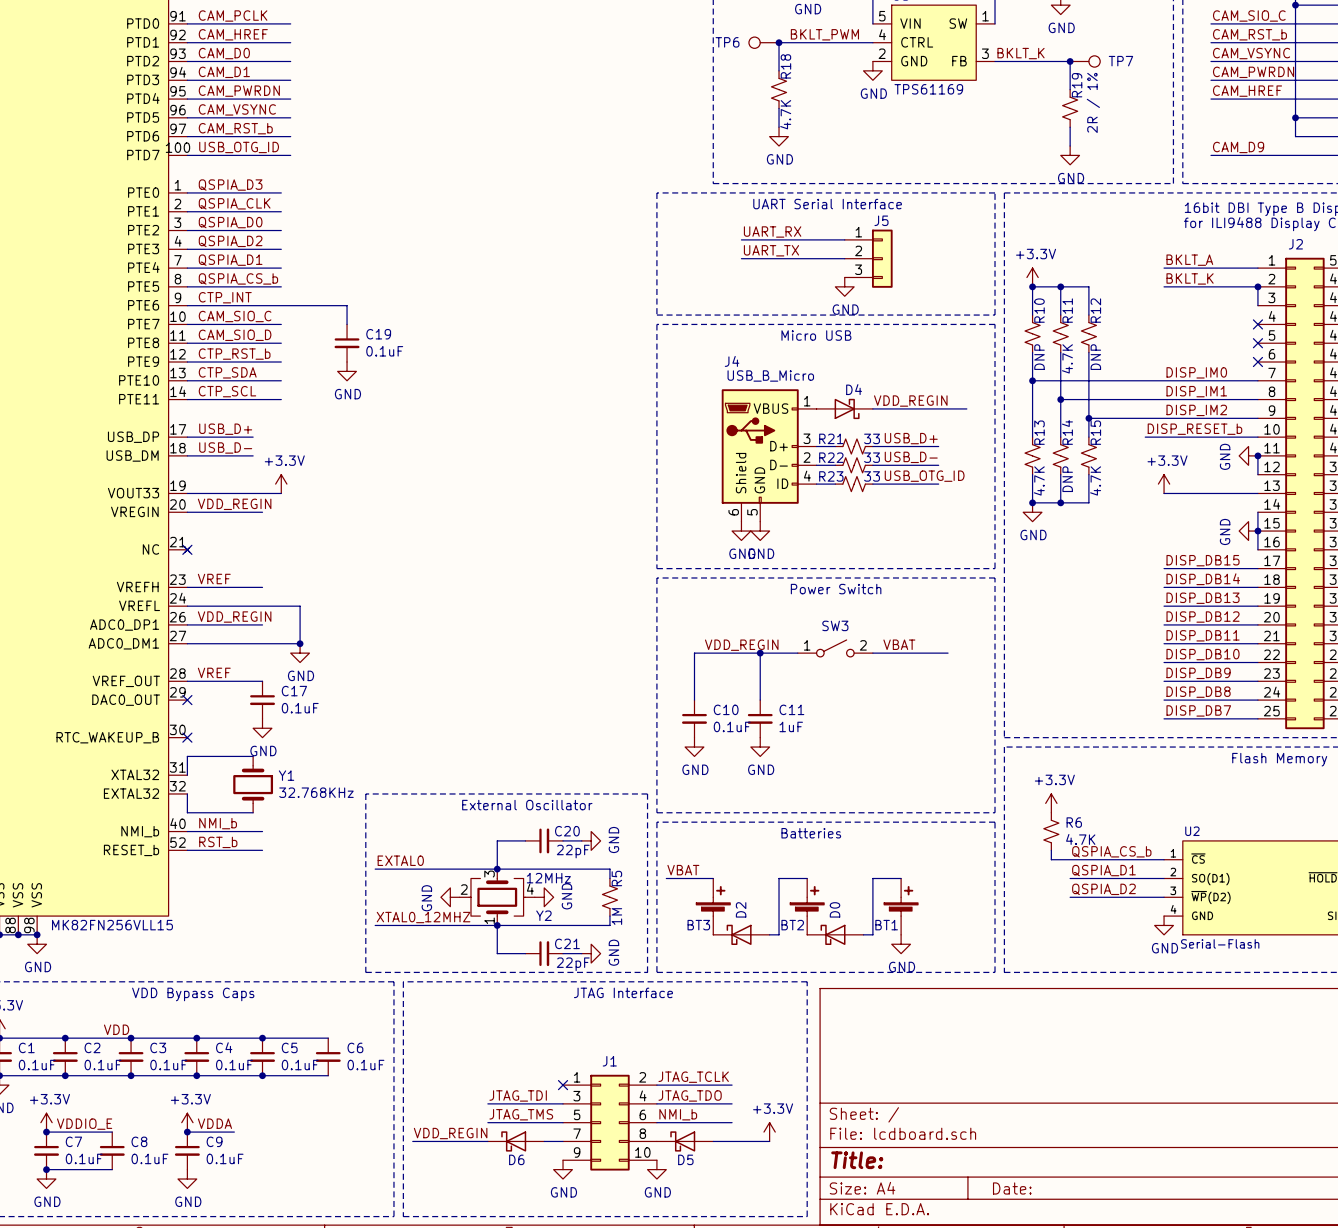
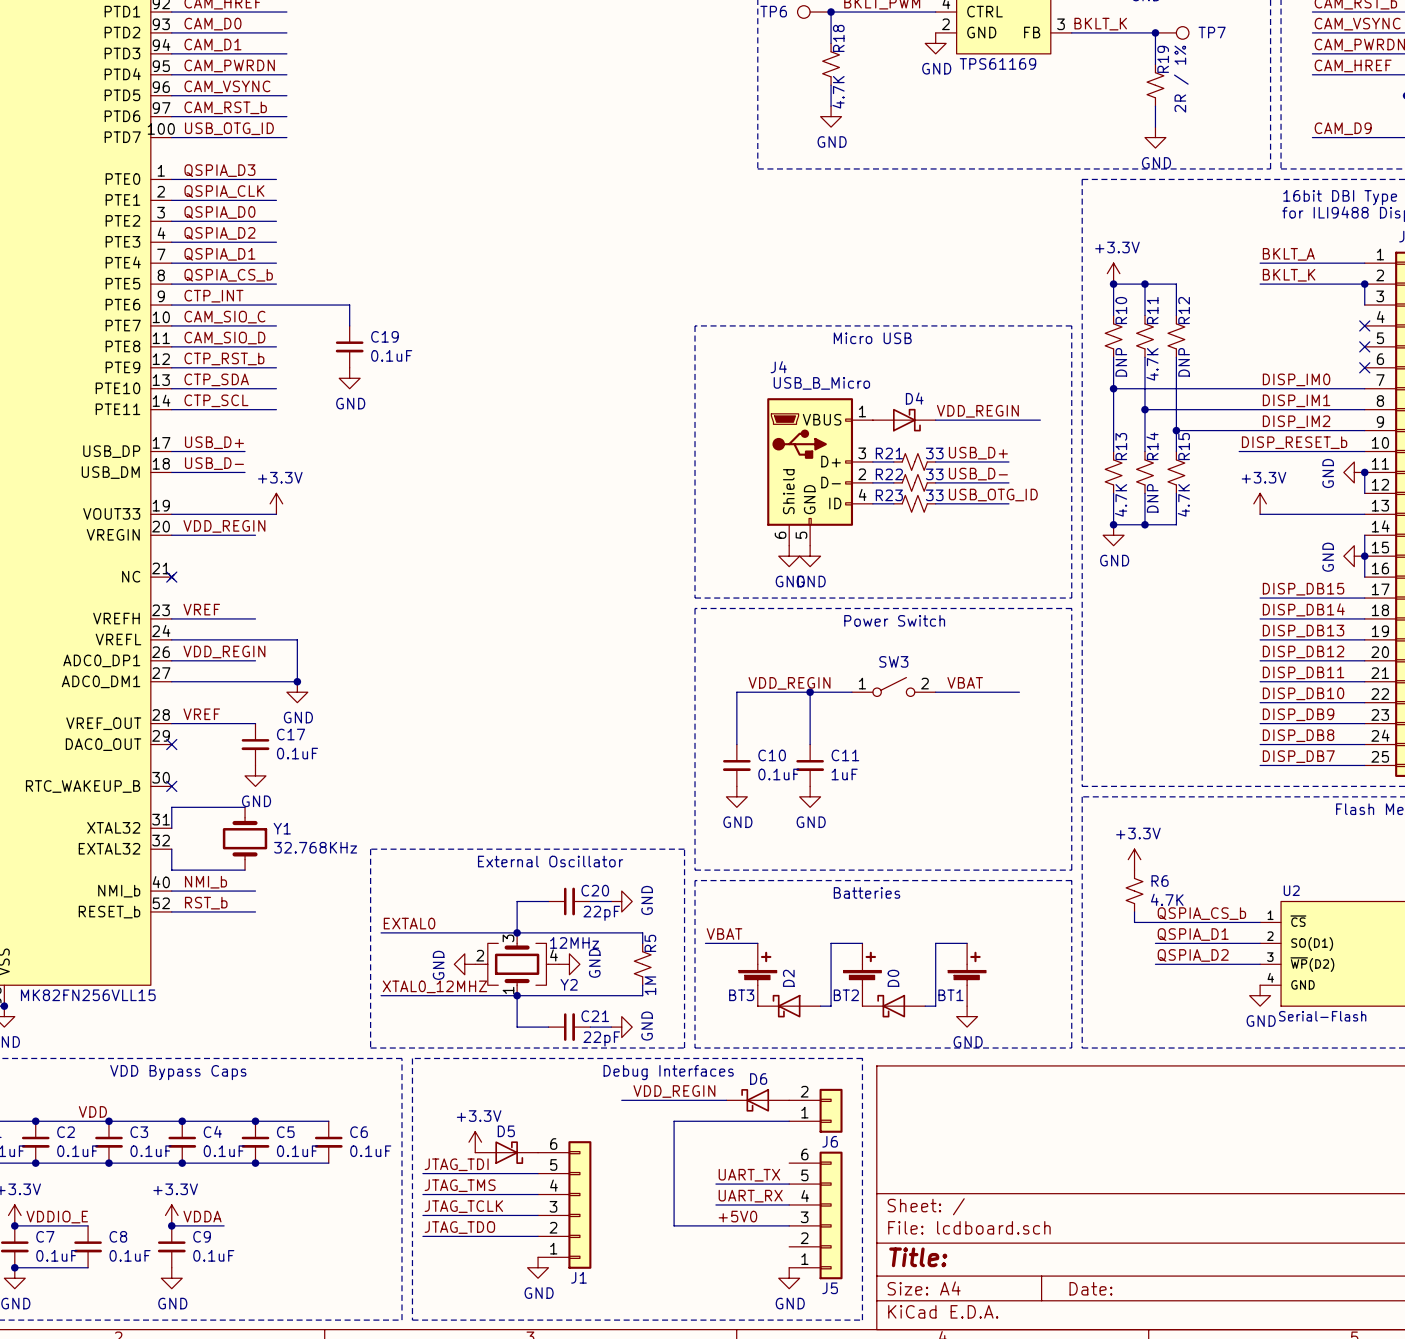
line: (656, 192) (995, 192) (995, 315) (656, 315) (656, 192) -> none
text: UART Serial Interface (827, 204) -> none
J5 name position: J5 (881, 220) -> J5 (830, 1288)
J5 symbol: [844, 229, 893, 288] -> [789, 1151, 843, 1280]
label: UART_RX (772, 231) -> none
wire: (741, 239) (844, 239) -> none
label: UART_TX (771, 250) -> none
wire: (741, 258) (844, 258) -> none
power symbol: GND (844, 286) -> none
text: JTAG Interface (623, 992) -> Debug Interfaces (668, 1072)
label: none -> VDD_REGIN (674, 1091)
wire: none -> (621, 1100) (726, 1100)
J6: none -> (815, 1110)
wire: none -> (789, 1121) (674, 1121) (674, 1225) (789, 1225)
power symbol: none -> +3.3V (475, 1142)
J1 name position: J1 (609, 1061) -> J1 (578, 1277)
J1 symbol: [563, 1074, 657, 1171] -> [538, 1141, 592, 1269]
label: JTAG_TCLK (693, 1077) -> none
wire: none -> (422, 1173) (538, 1173)
no-connect mark: (563, 1085) -> none
wire: (656, 1085) (732, 1085) -> none
label: none -> UART_TX (749, 1175)
wire: none -> (715, 1184) (789, 1184)
label position: JTAG_TDI (518, 1095) -> JTAG_TDI (456, 1164)
label: JTAG_TDO (690, 1095) -> none
wire: none -> (422, 1194) (506, 1194)
wire: (656, 1103) (732, 1103) -> none
label: none -> UART_RX (750, 1196)
wire: none -> (715, 1204) (789, 1204)
label: none -> JTAG_TCLK (463, 1206)
label position: JTAG_TMS (521, 1114) -> JTAG_TMS (460, 1185)
label: NMI_b (678, 1114) -> none
wire: none -> (422, 1215) (506, 1215)
wire: (656, 1122) (732, 1122) -> none
label: none -> +5V0 (737, 1216)
power symbol: +3.3V (769, 1132) -> none
label: VDD_REGIN (450, 1133) -> JTAG_TDO (459, 1227)
D6 position: (516, 1141) -> (757, 1100)
D5 rotation: 0° (682, 1141) -> 180° (509, 1152)
D5 position: (685, 1141) -> (506, 1152)
wire: (713, 1141) (769, 1141) -> none
D6 name position: D6 (516, 1159) -> D6 (758, 1079)
power symbol position: GND (563, 1169) -> GND (538, 1267)
power symbol: GND (656, 1169) -> none
power symbol: none -> GND (789, 1278)

